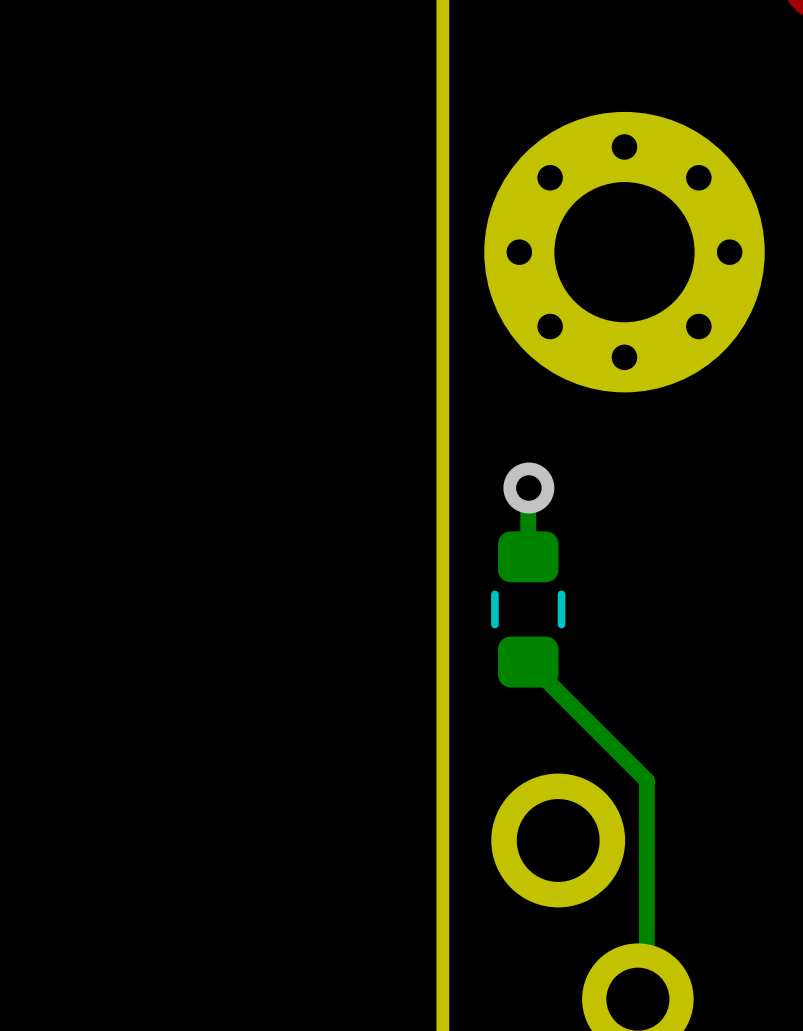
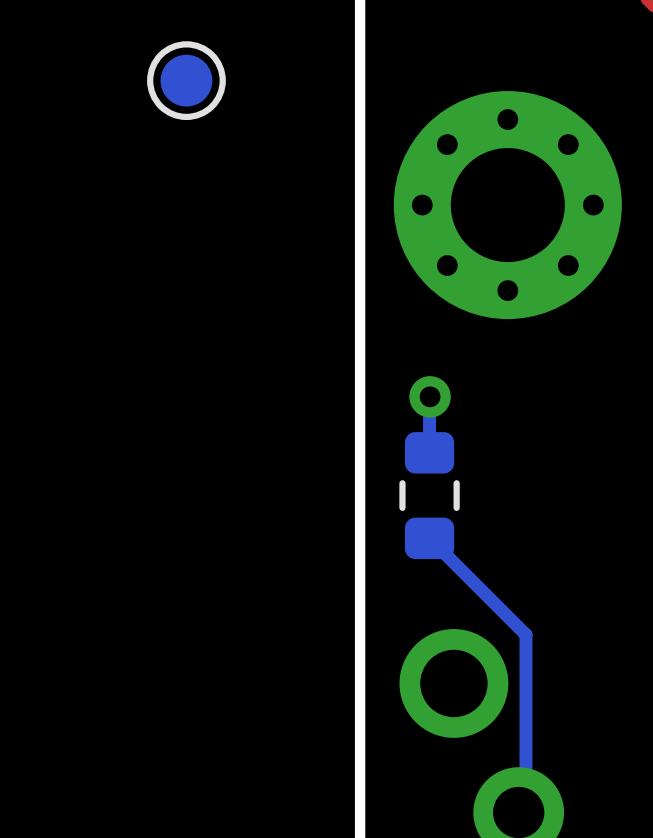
part: none -> (186, 80)

